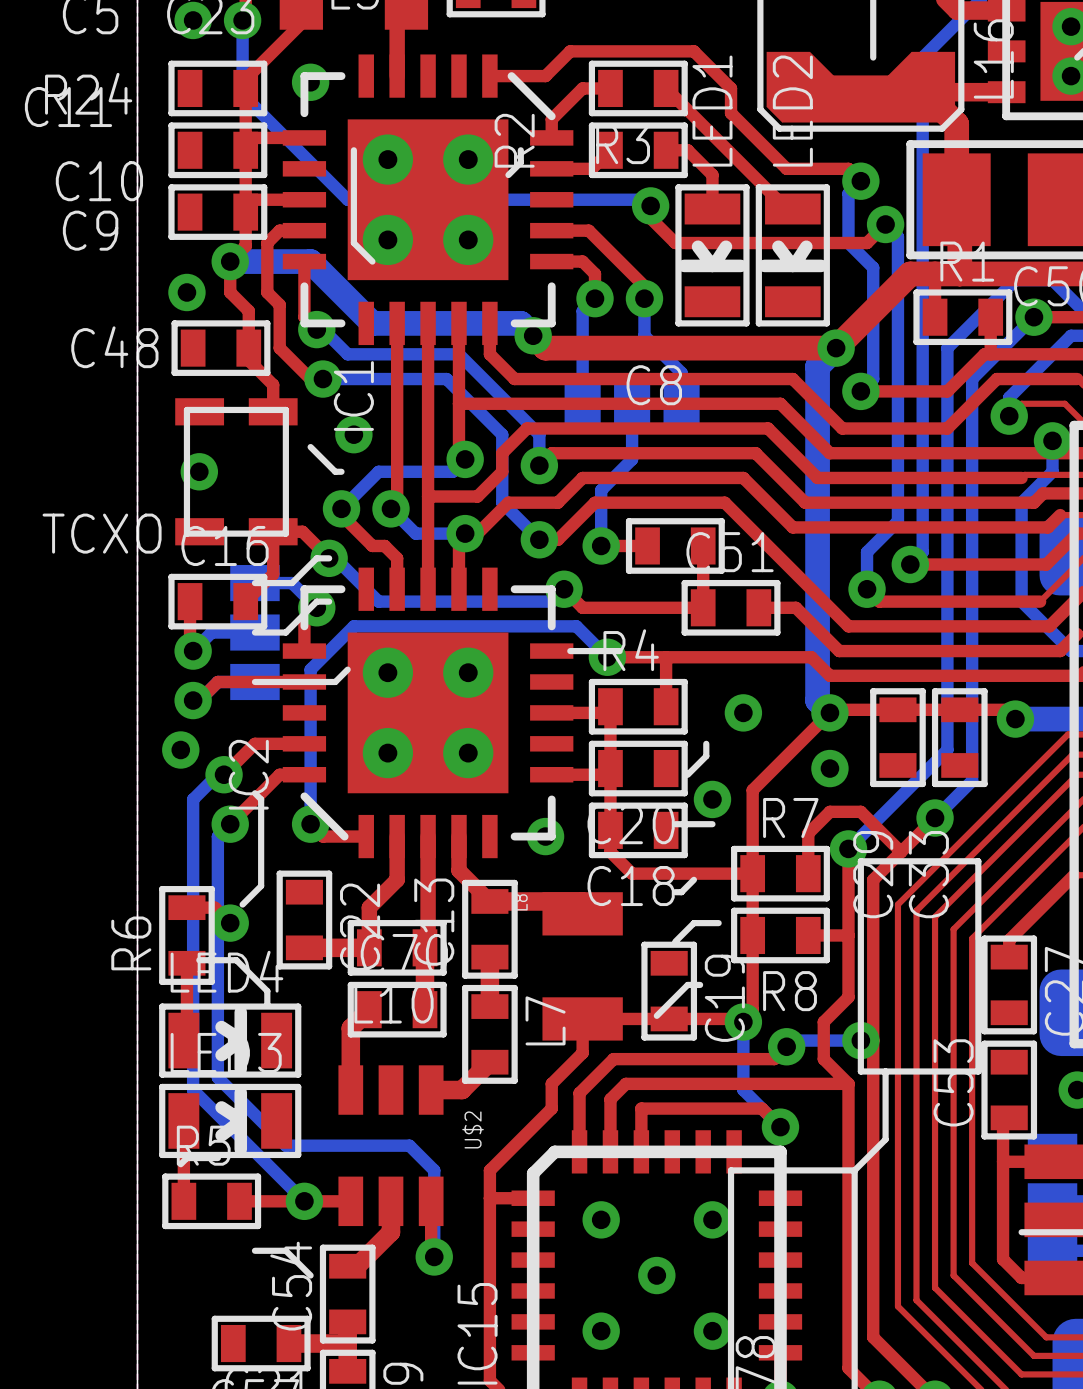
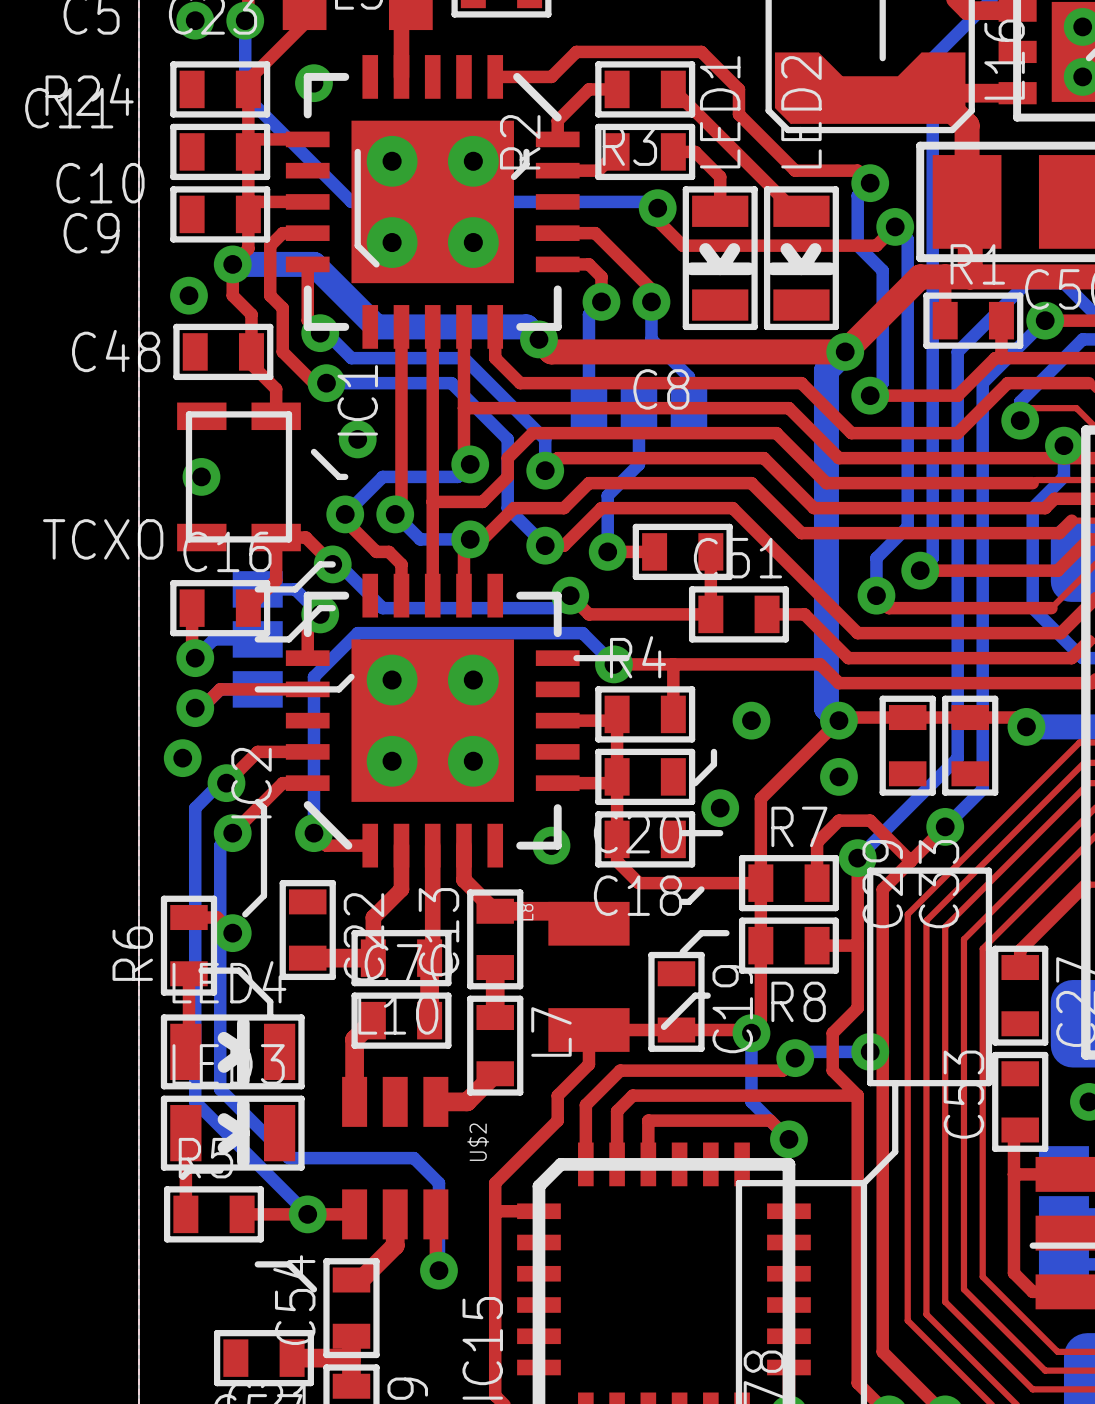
via: (601, 1219) -> none
via: (712, 1219) -> none
via: (656, 1275) -> none
via: (601, 1331) -> none
via: (712, 1331) -> none

